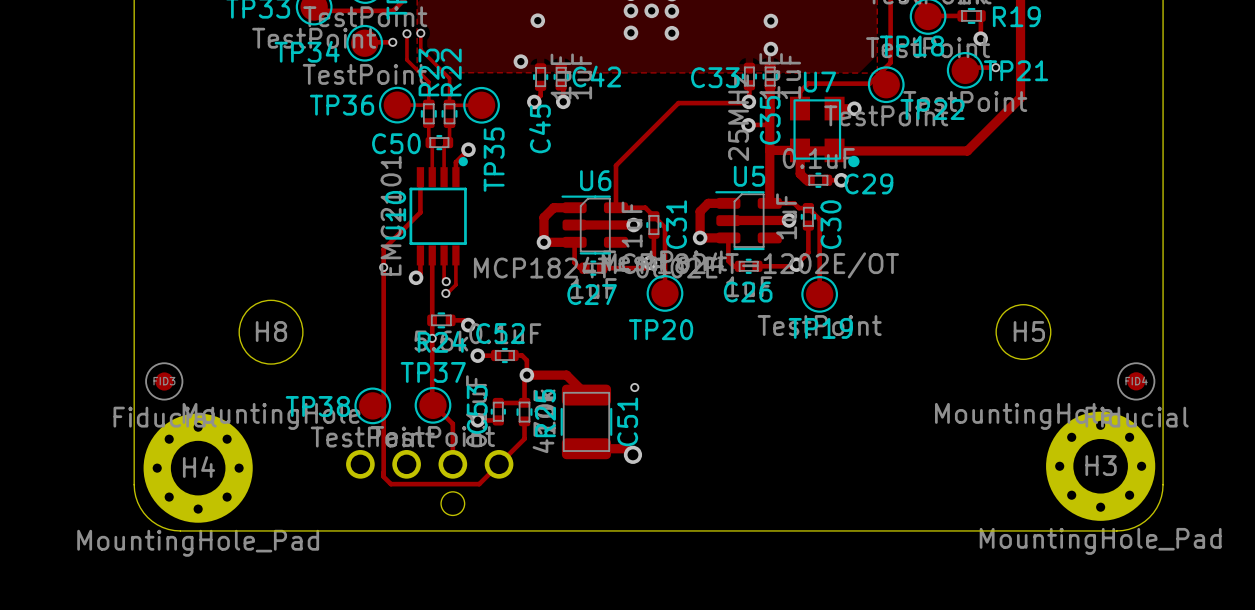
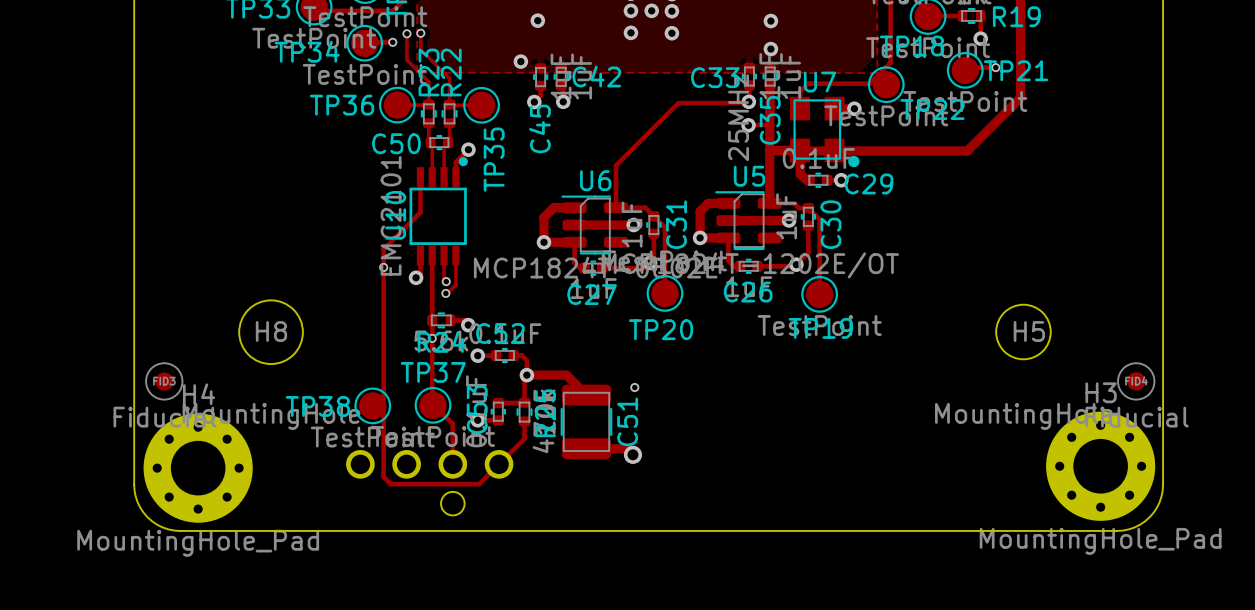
H3 name position: H3 (1101, 465) -> H3 (1101, 392)
H4 name position: H4 (199, 467) -> H4 (199, 394)

